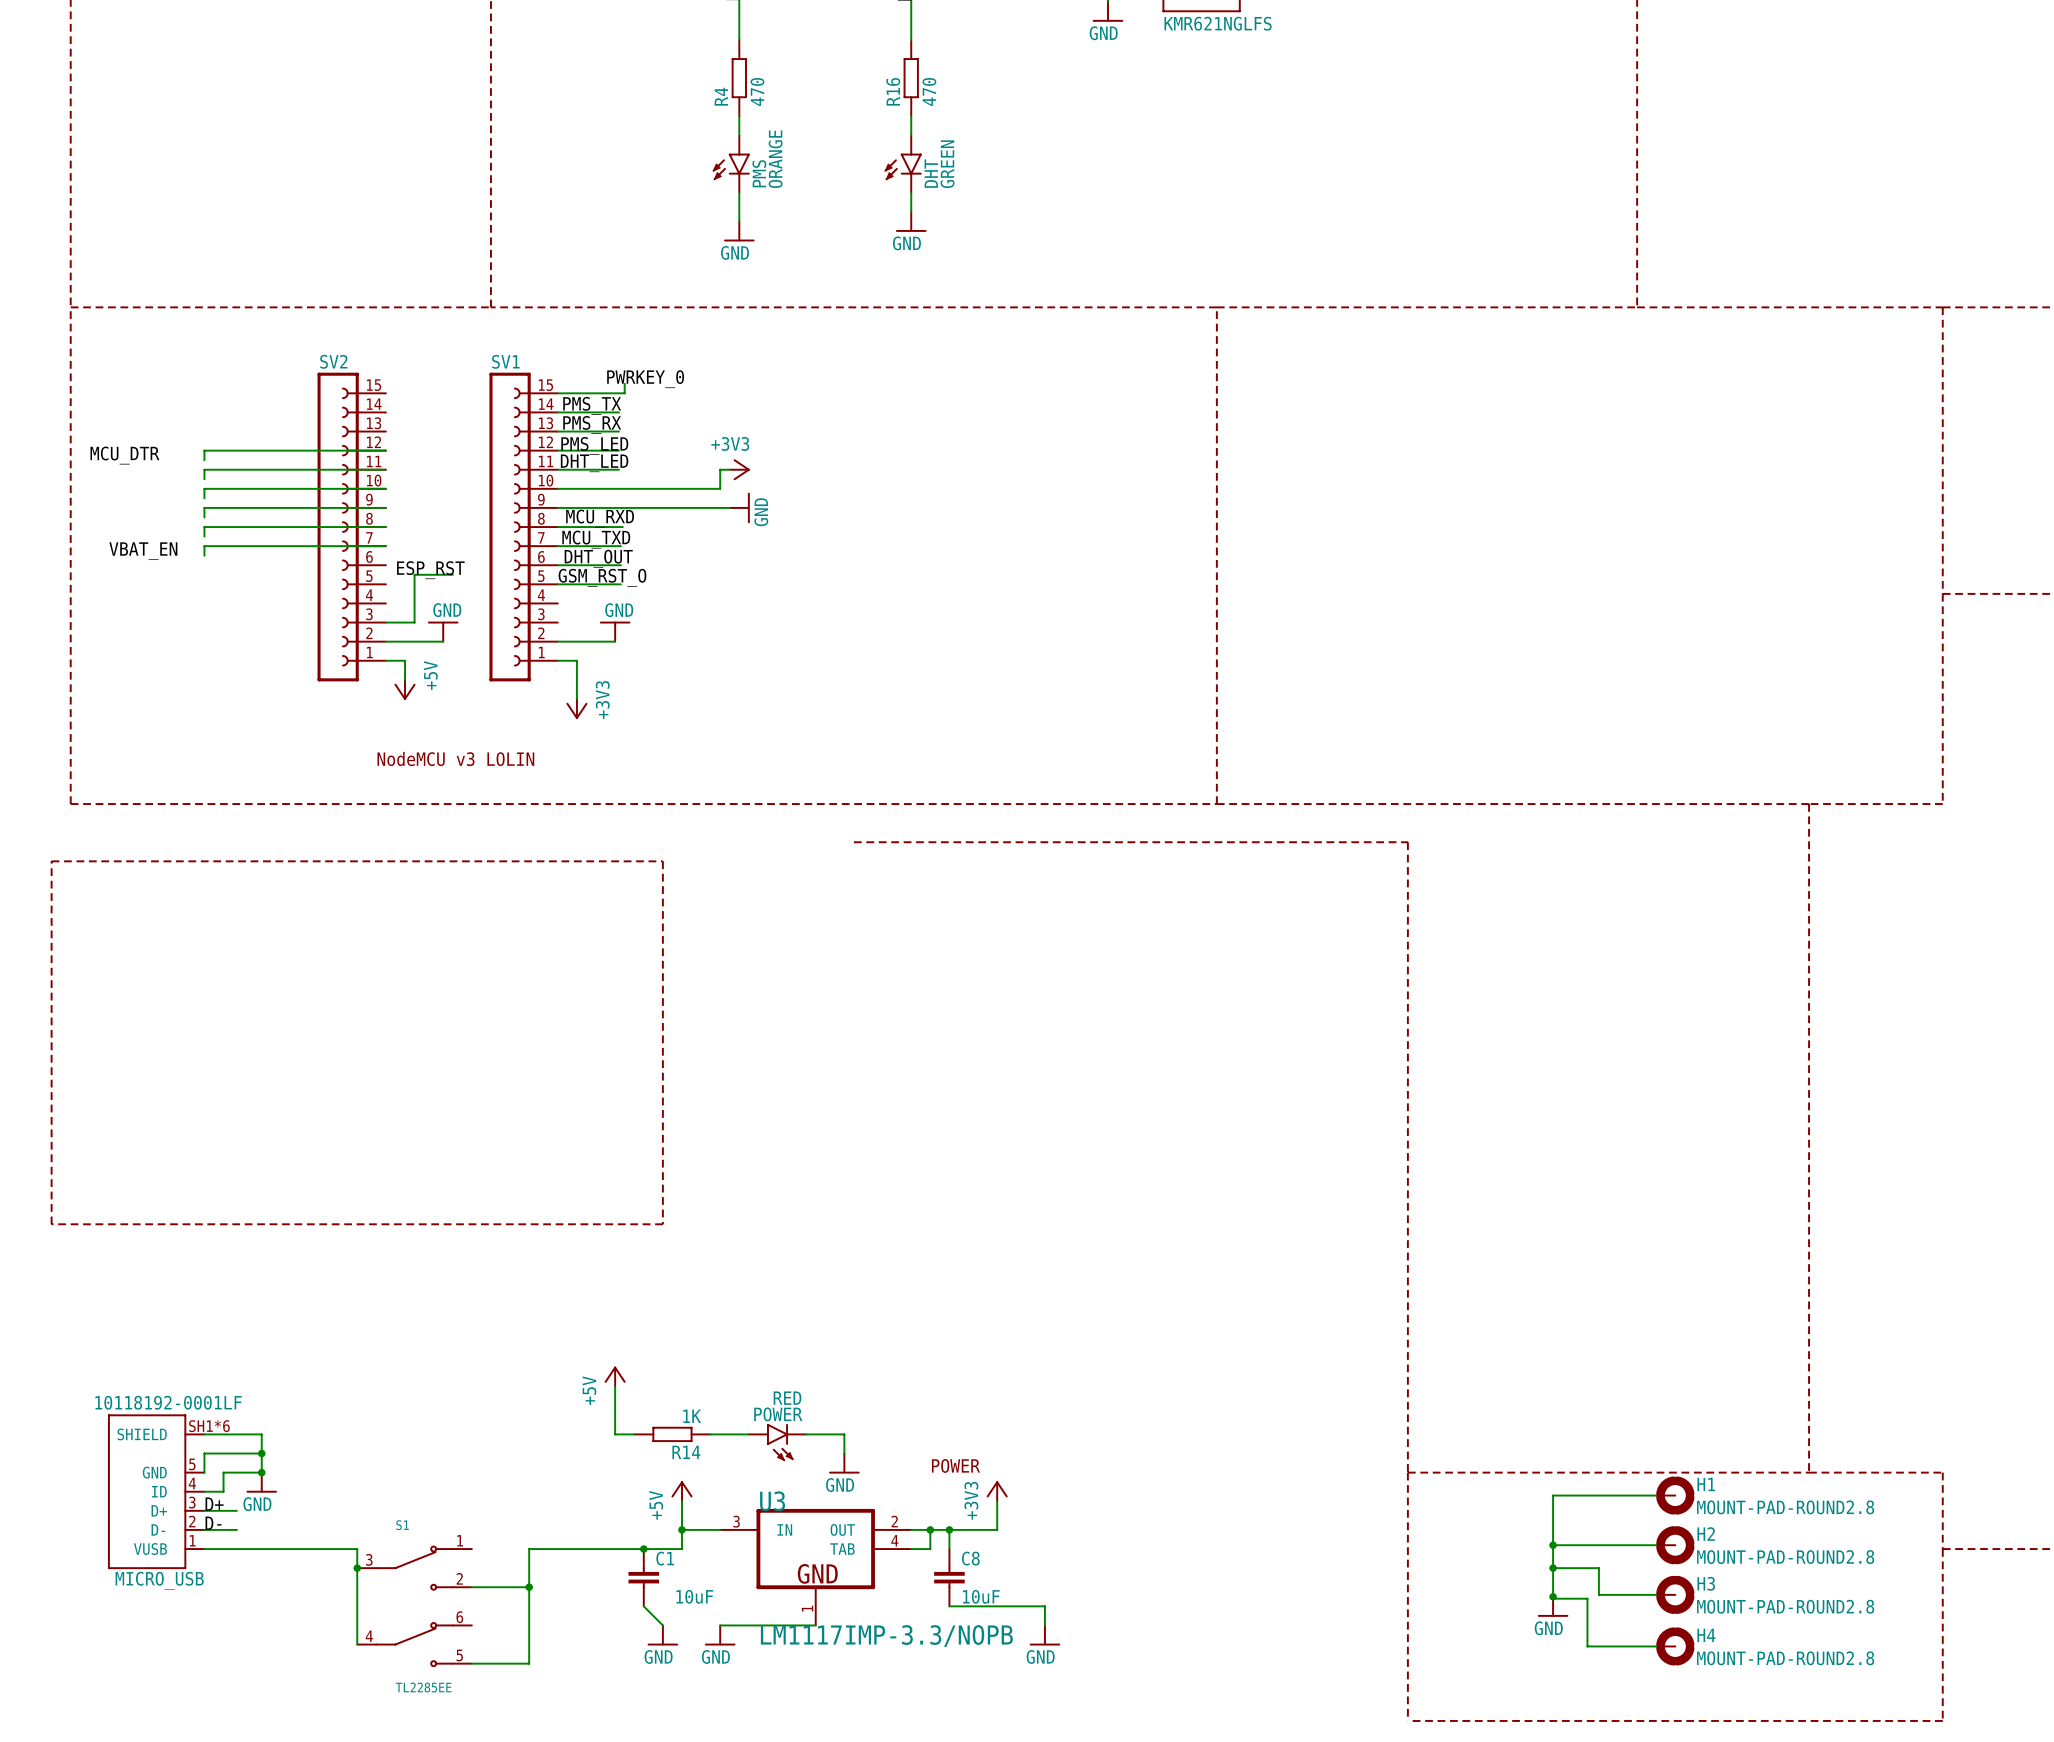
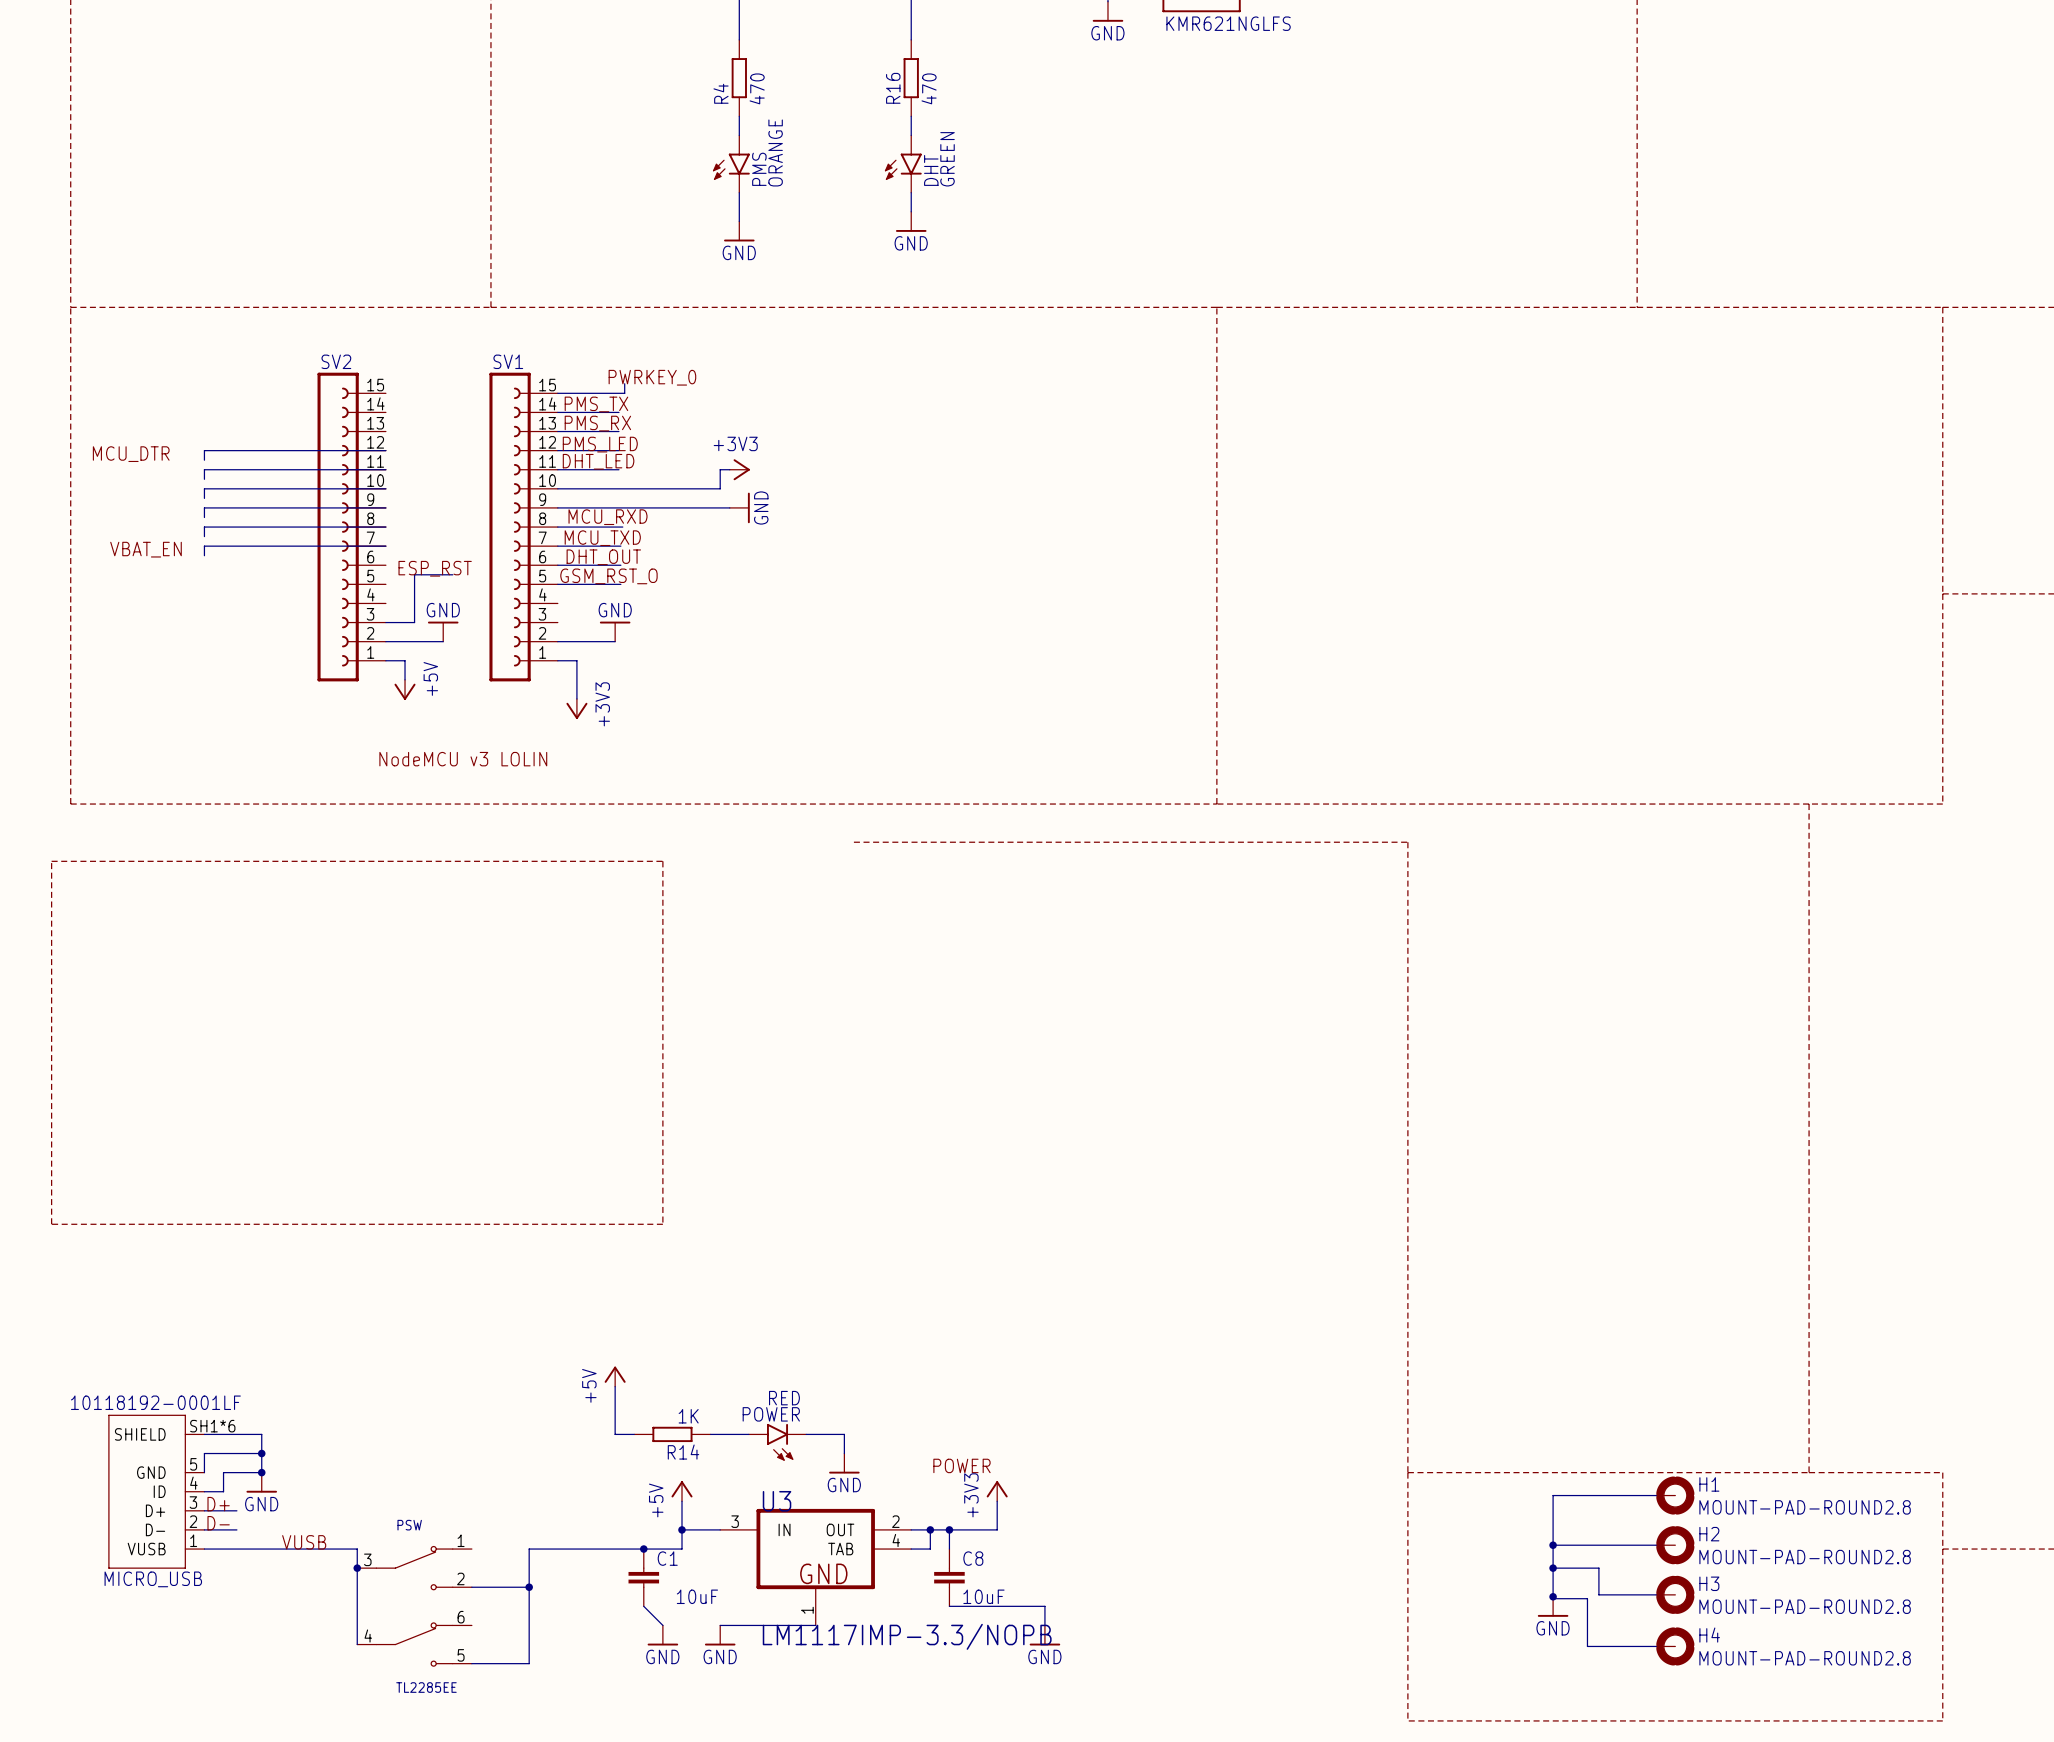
S1 name: S1 (402, 1525) -> PSW (409, 1525)
label: none -> VUSB (304, 1542)

